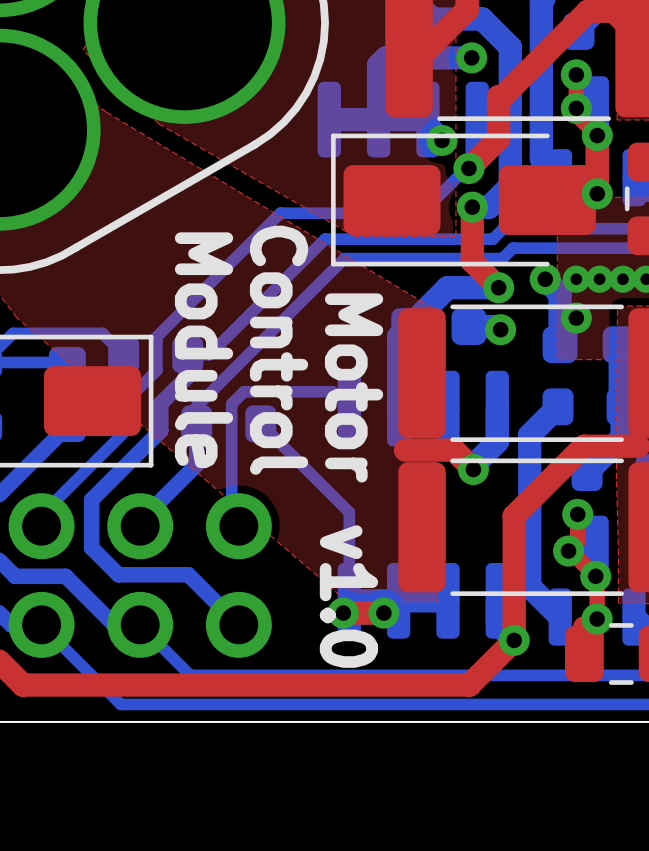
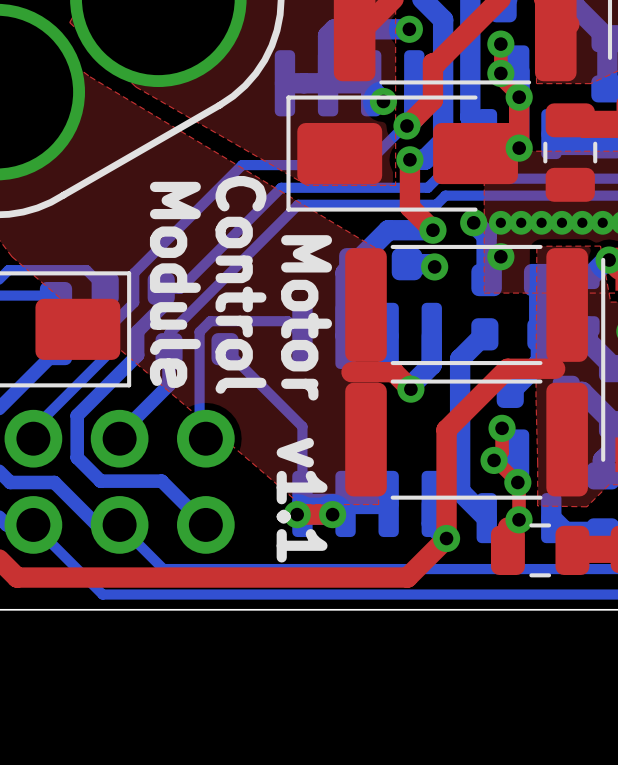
text: v1.0 (348, 596) -> v1.1 (302, 500)

